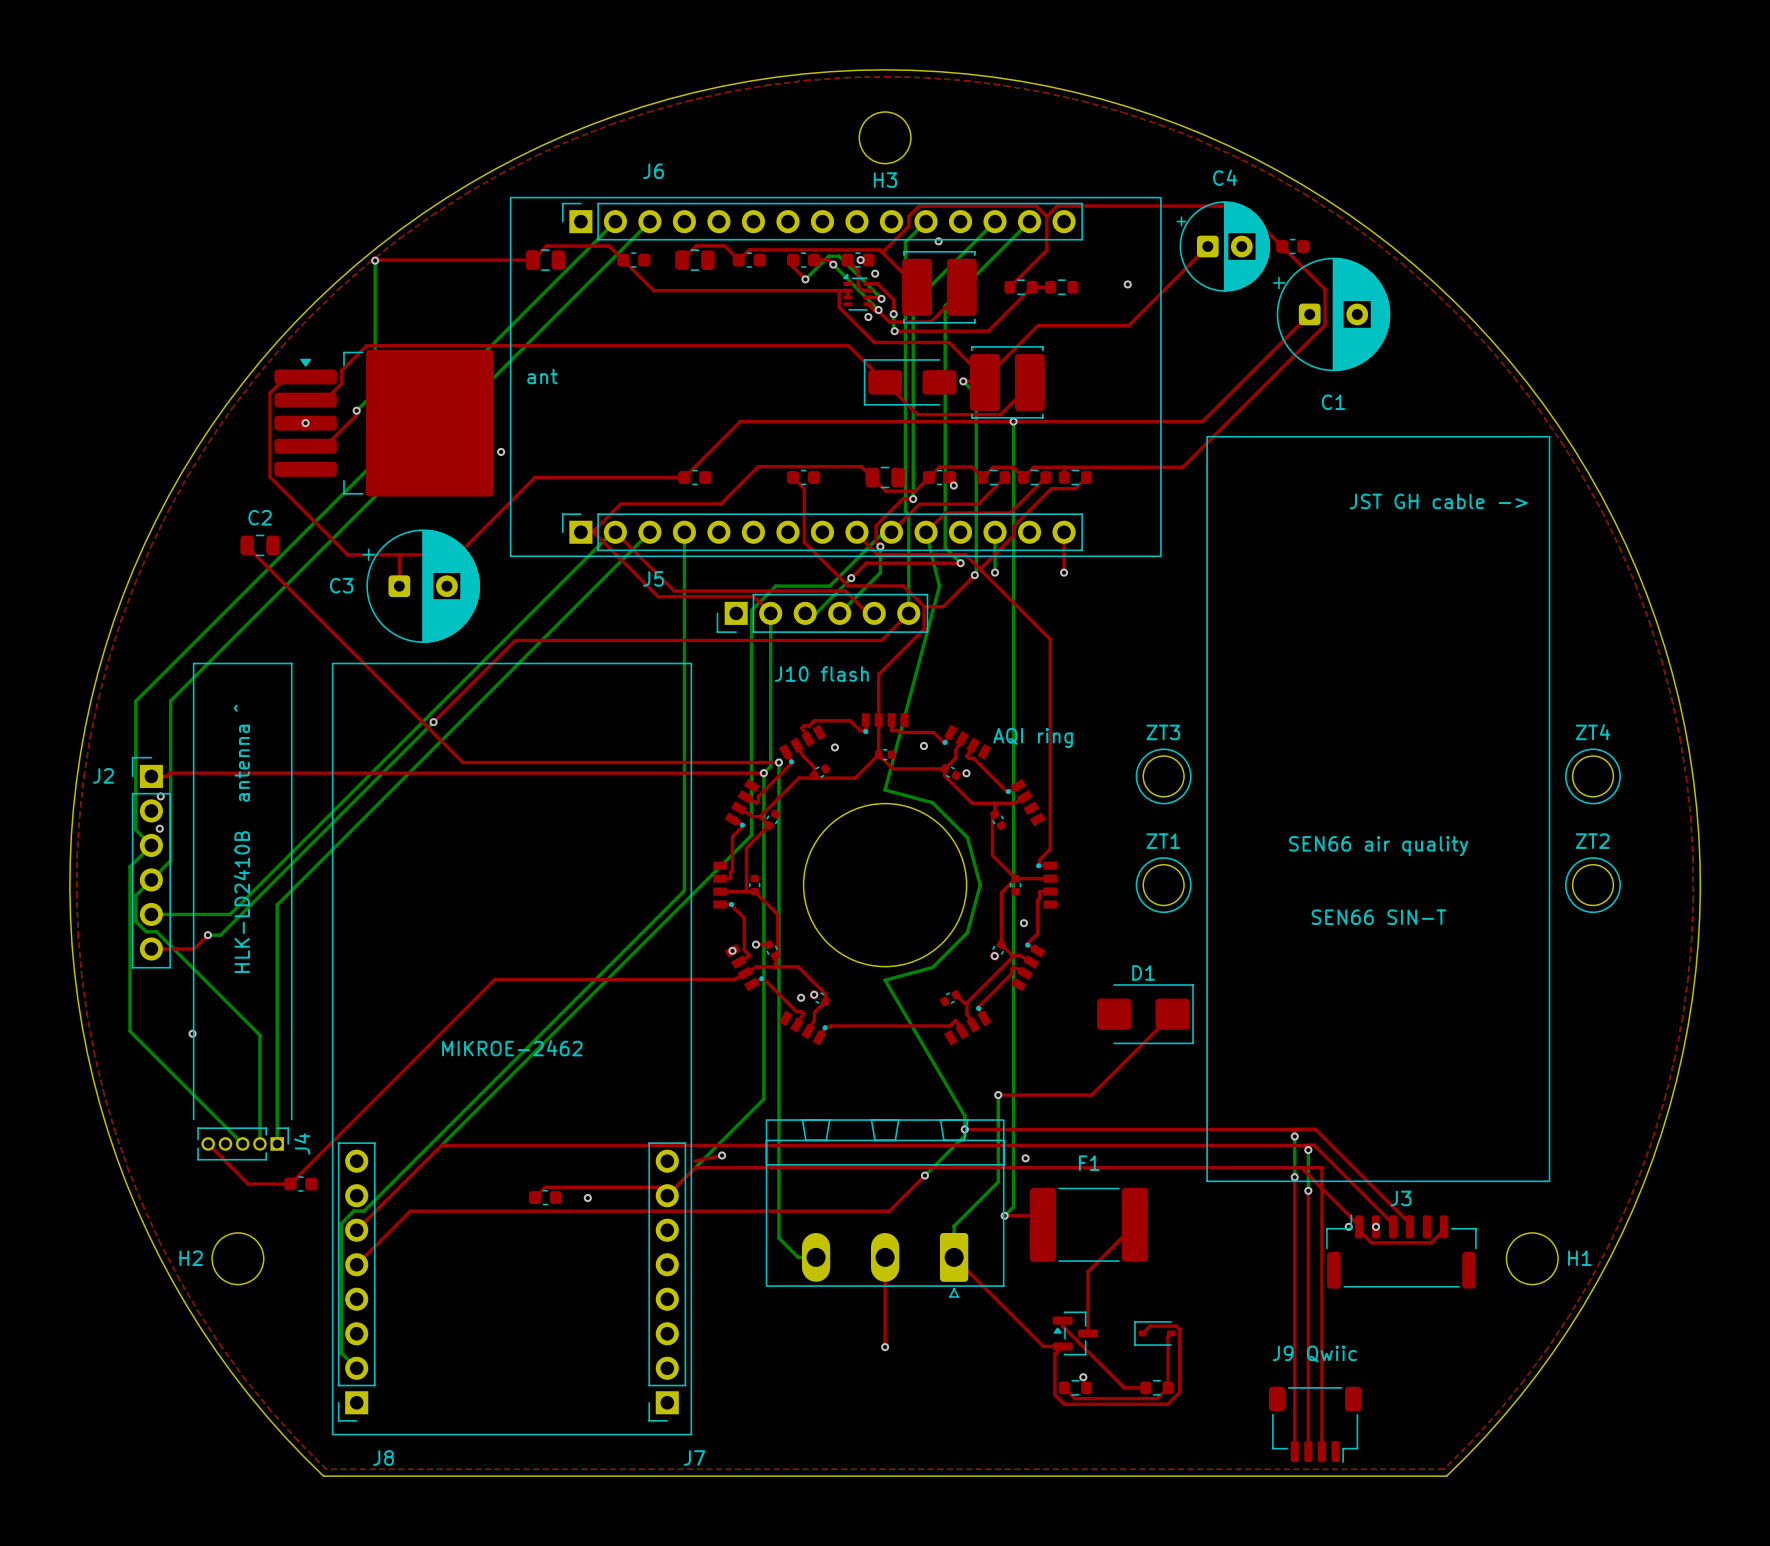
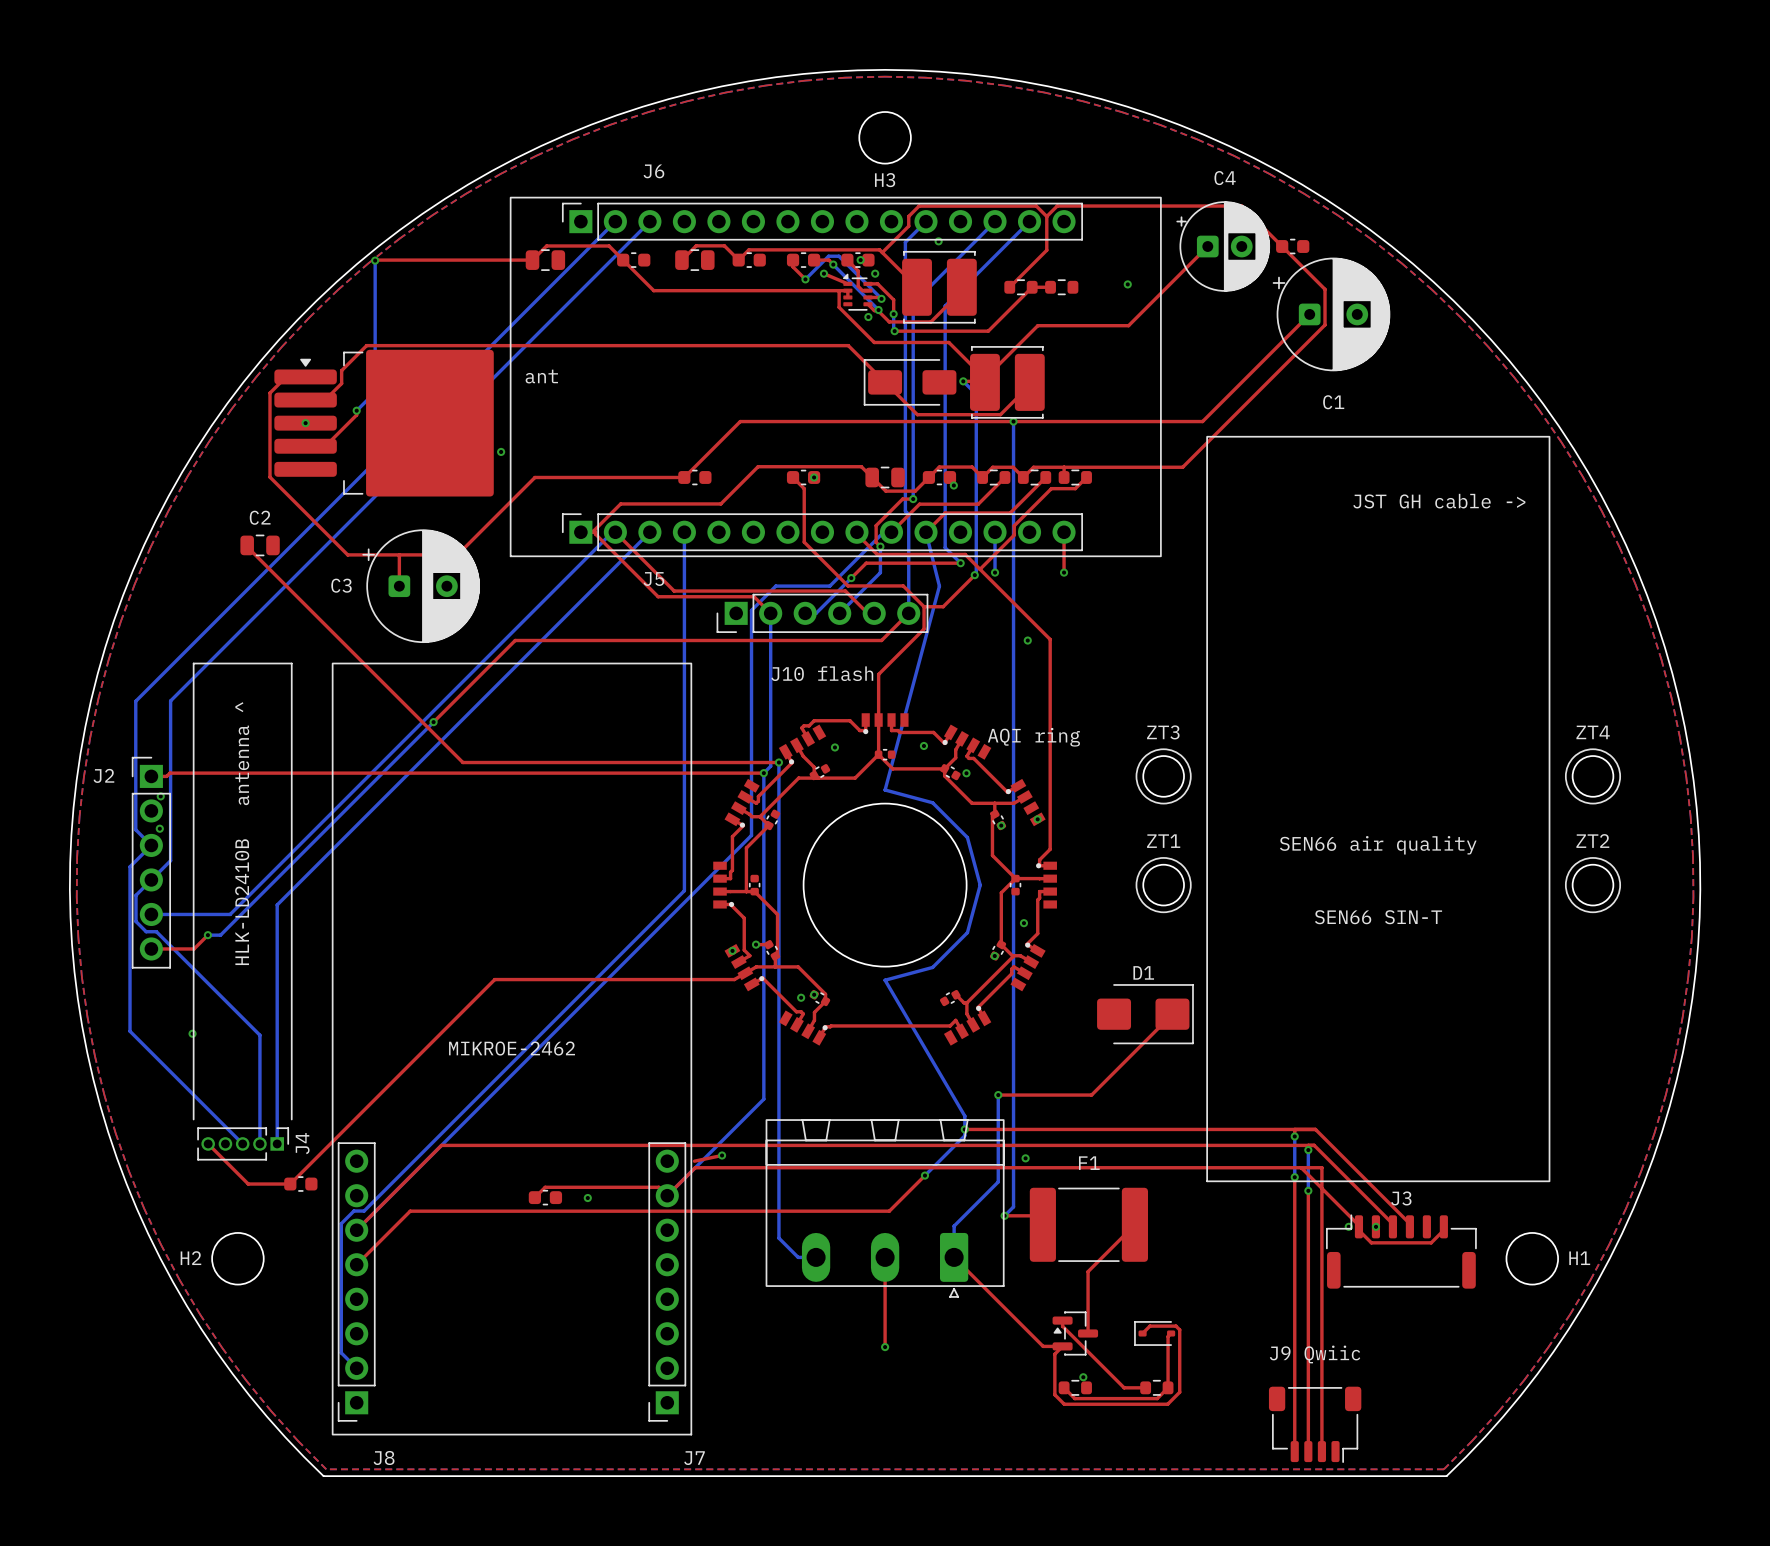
top track: none -> (823, 273) (847, 283)
via: none -> (823, 273)
via: none -> (814, 477)
via: none -> (1027, 640)
via: none -> (1037, 819)
via: none -> (1001, 825)

